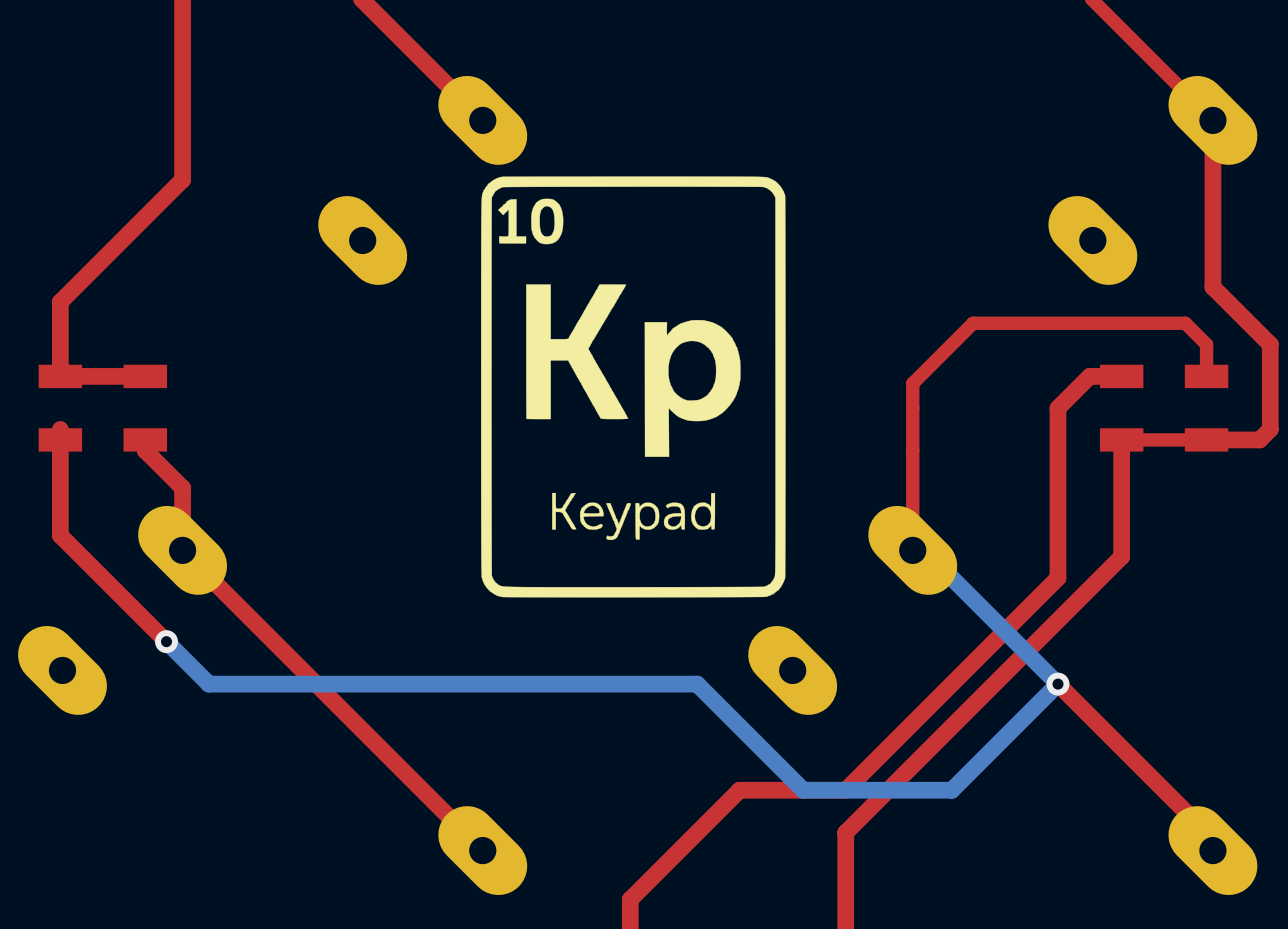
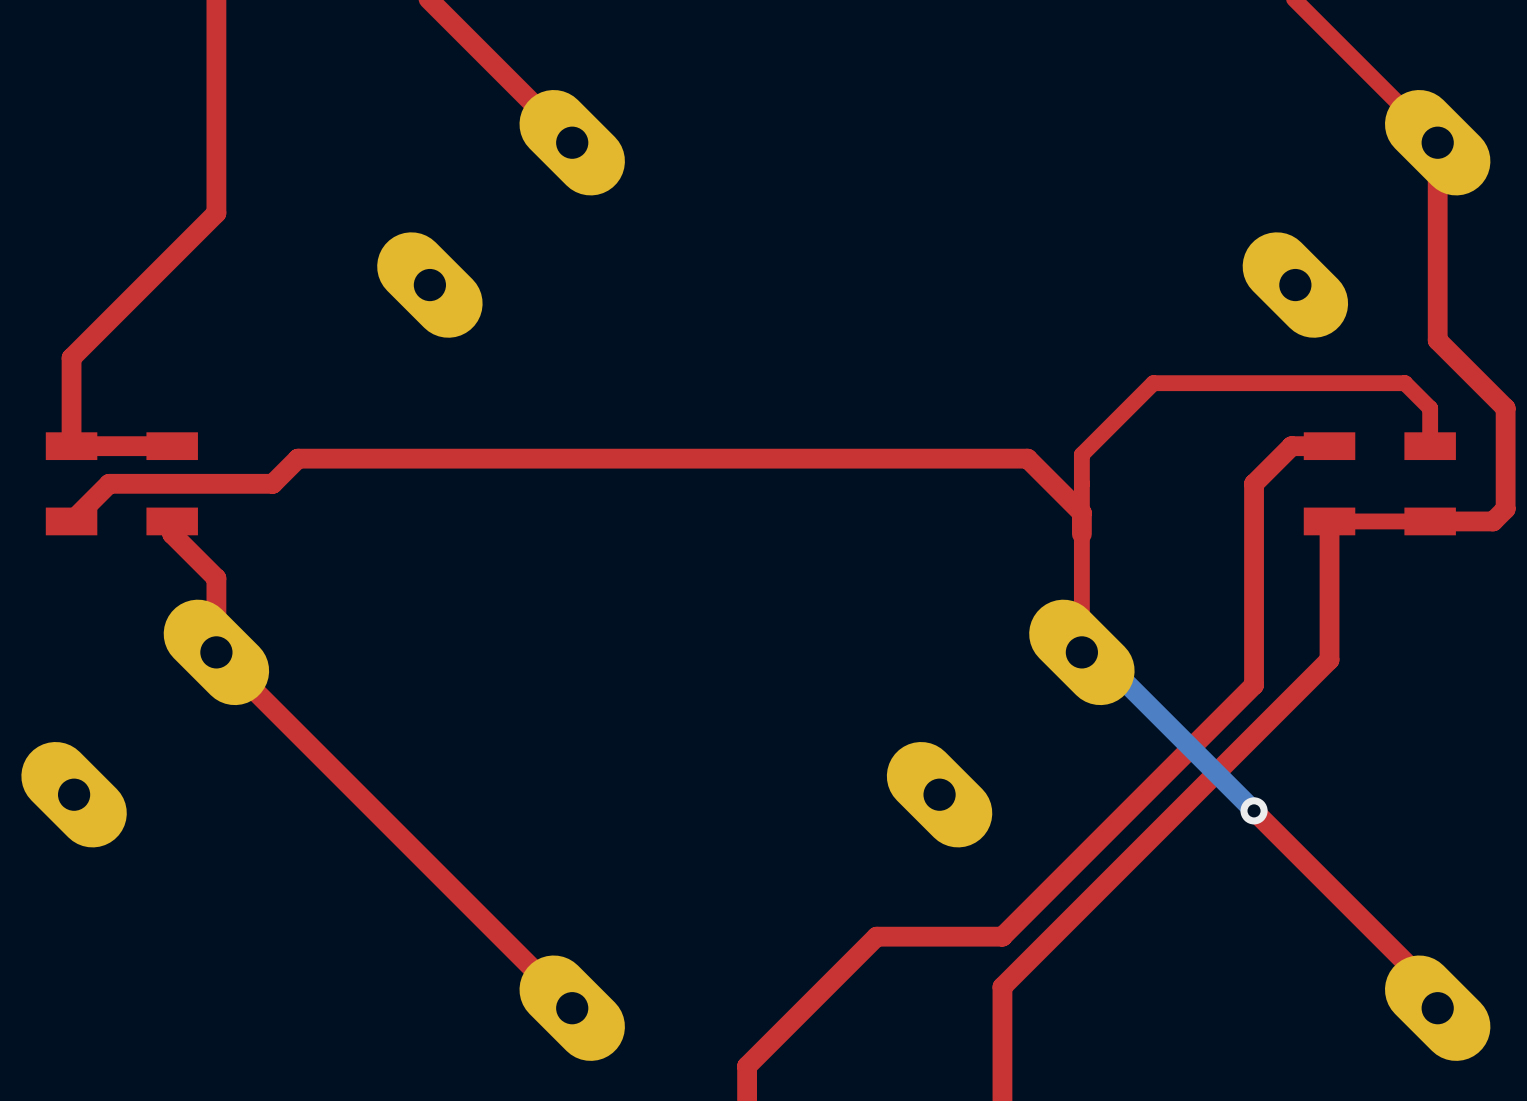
drawing: [481, 176, 786, 598] -> none
top track: (60, 429) (60, 535) (166, 641) -> none
top track: none -> (71, 521) (109, 483) (272, 483) (297, 458) (1027, 458) (1081, 512) (1081, 534)
bottom track: (166, 641) (208, 684) (697, 684) (803, 790) (951, 790) (1057, 684) -> none
via: (166, 641) -> none

